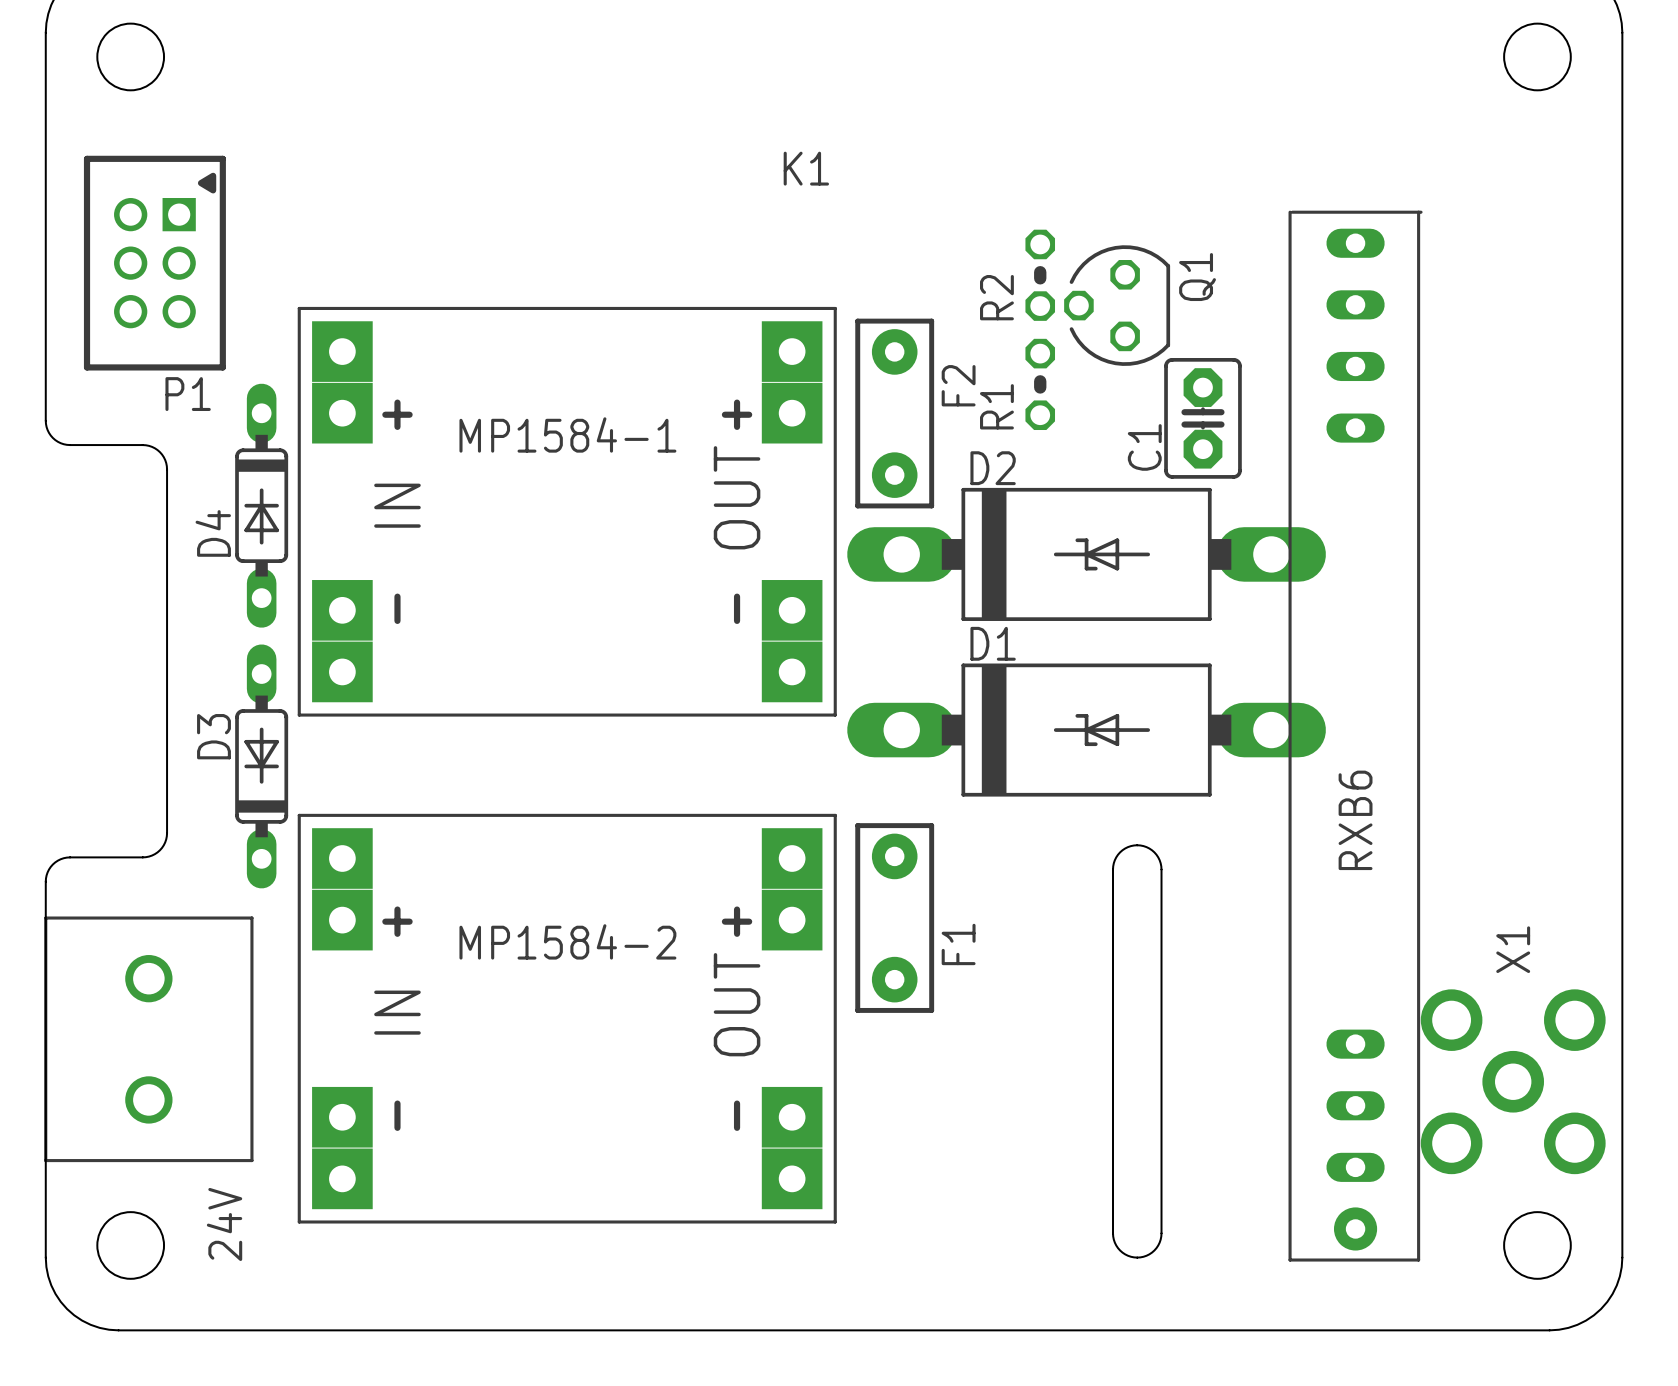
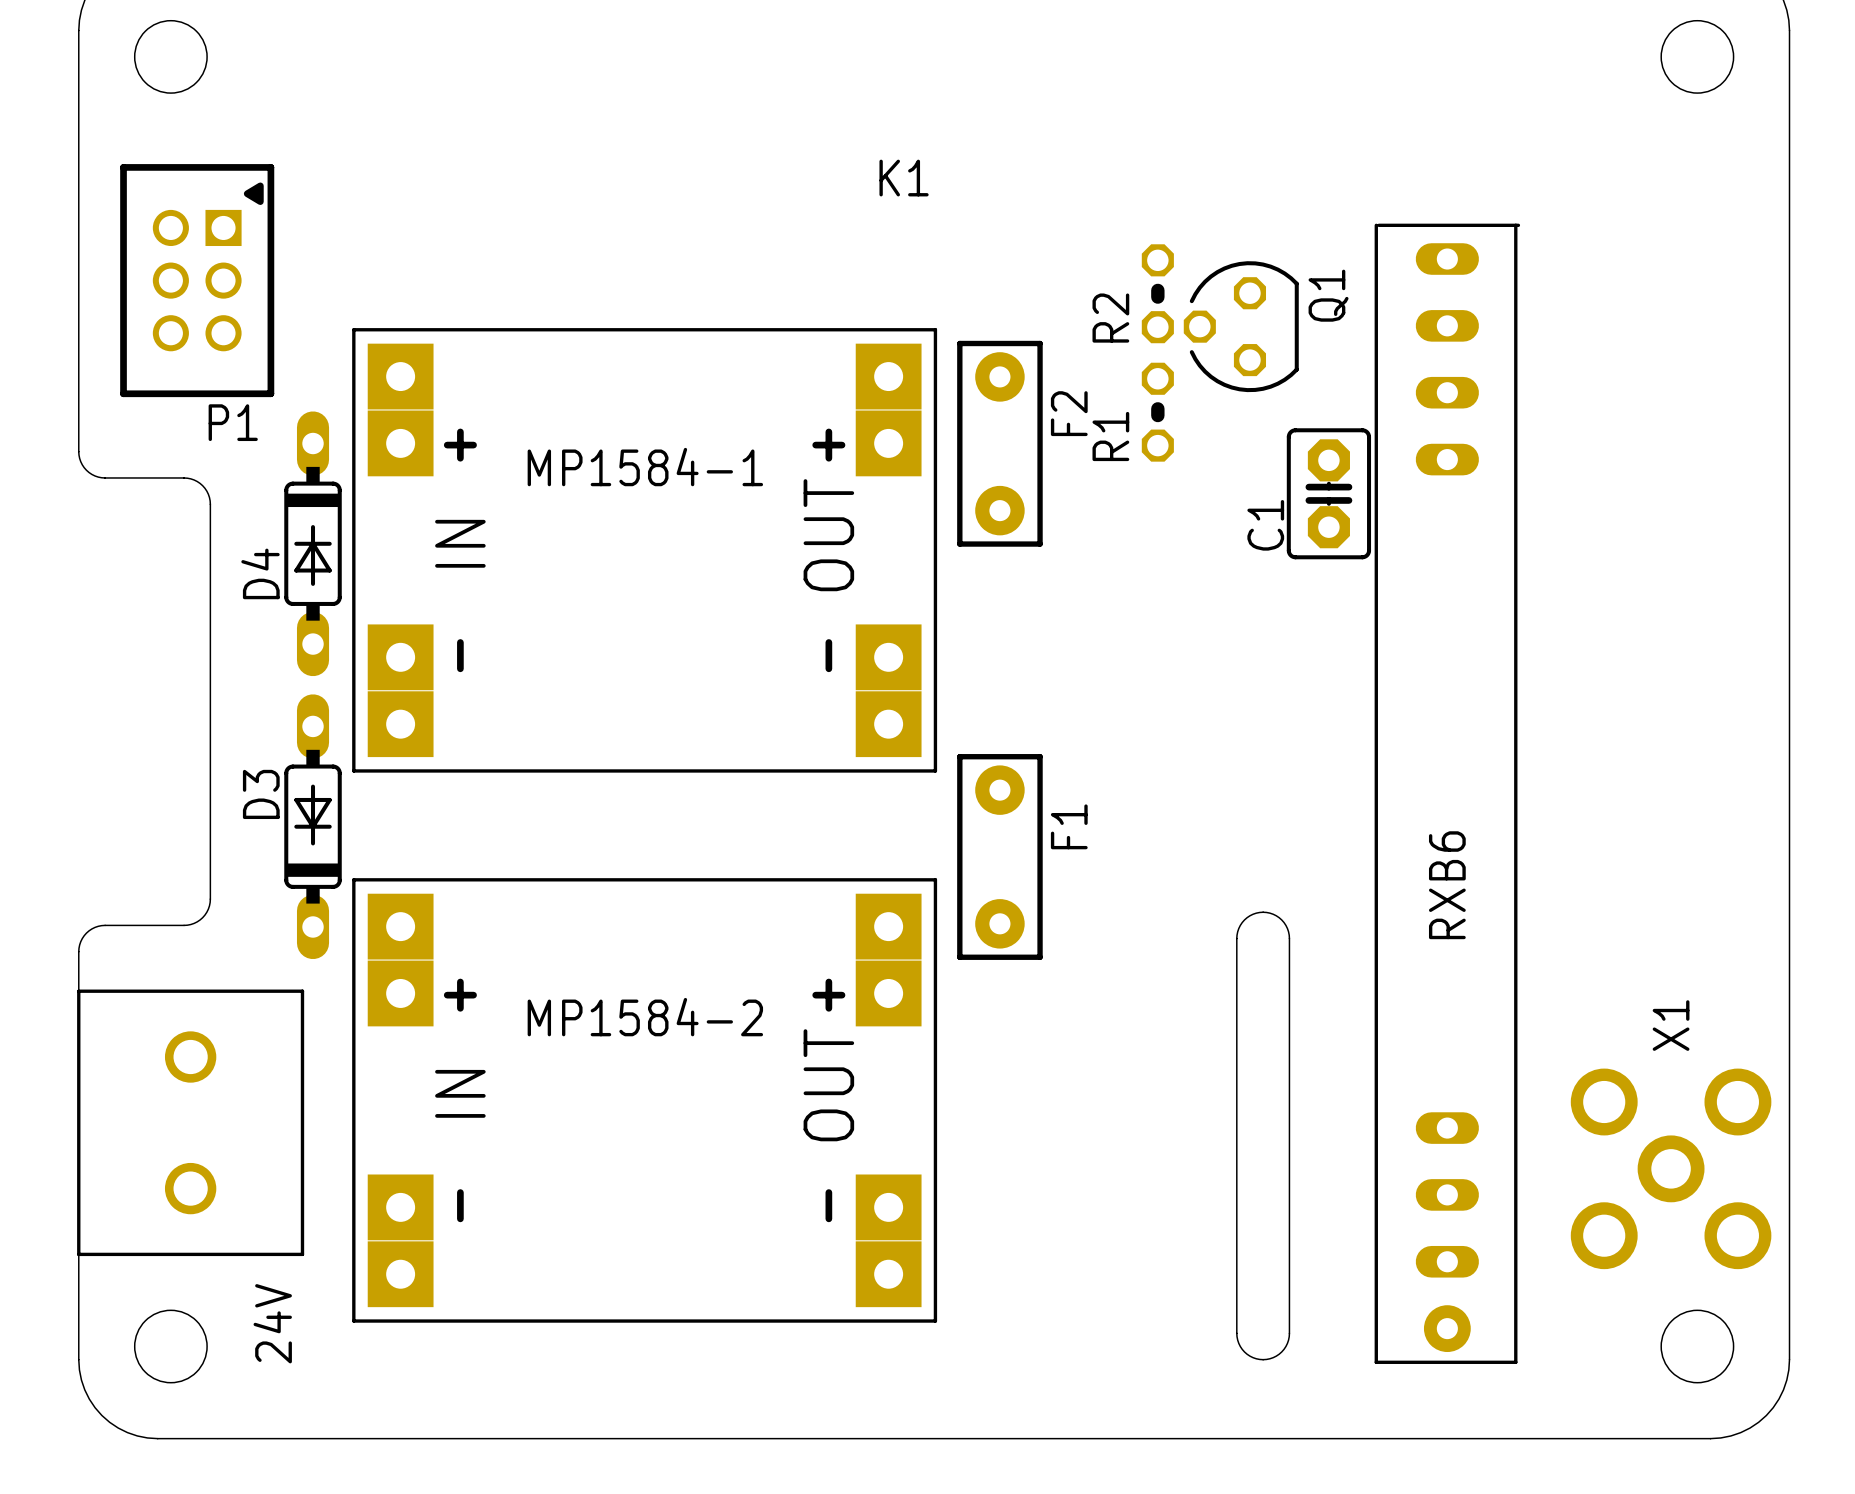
C1 position: (1202, 418) -> (1328, 493)
D2: (1086, 554) -> none
D1: (1086, 730) -> none
RXB6 position: (1355, 736) -> (1447, 793)
F1 position: (894, 918) -> (999, 856)
F1 name position: F1 (958, 944) -> F1 (1069, 826)

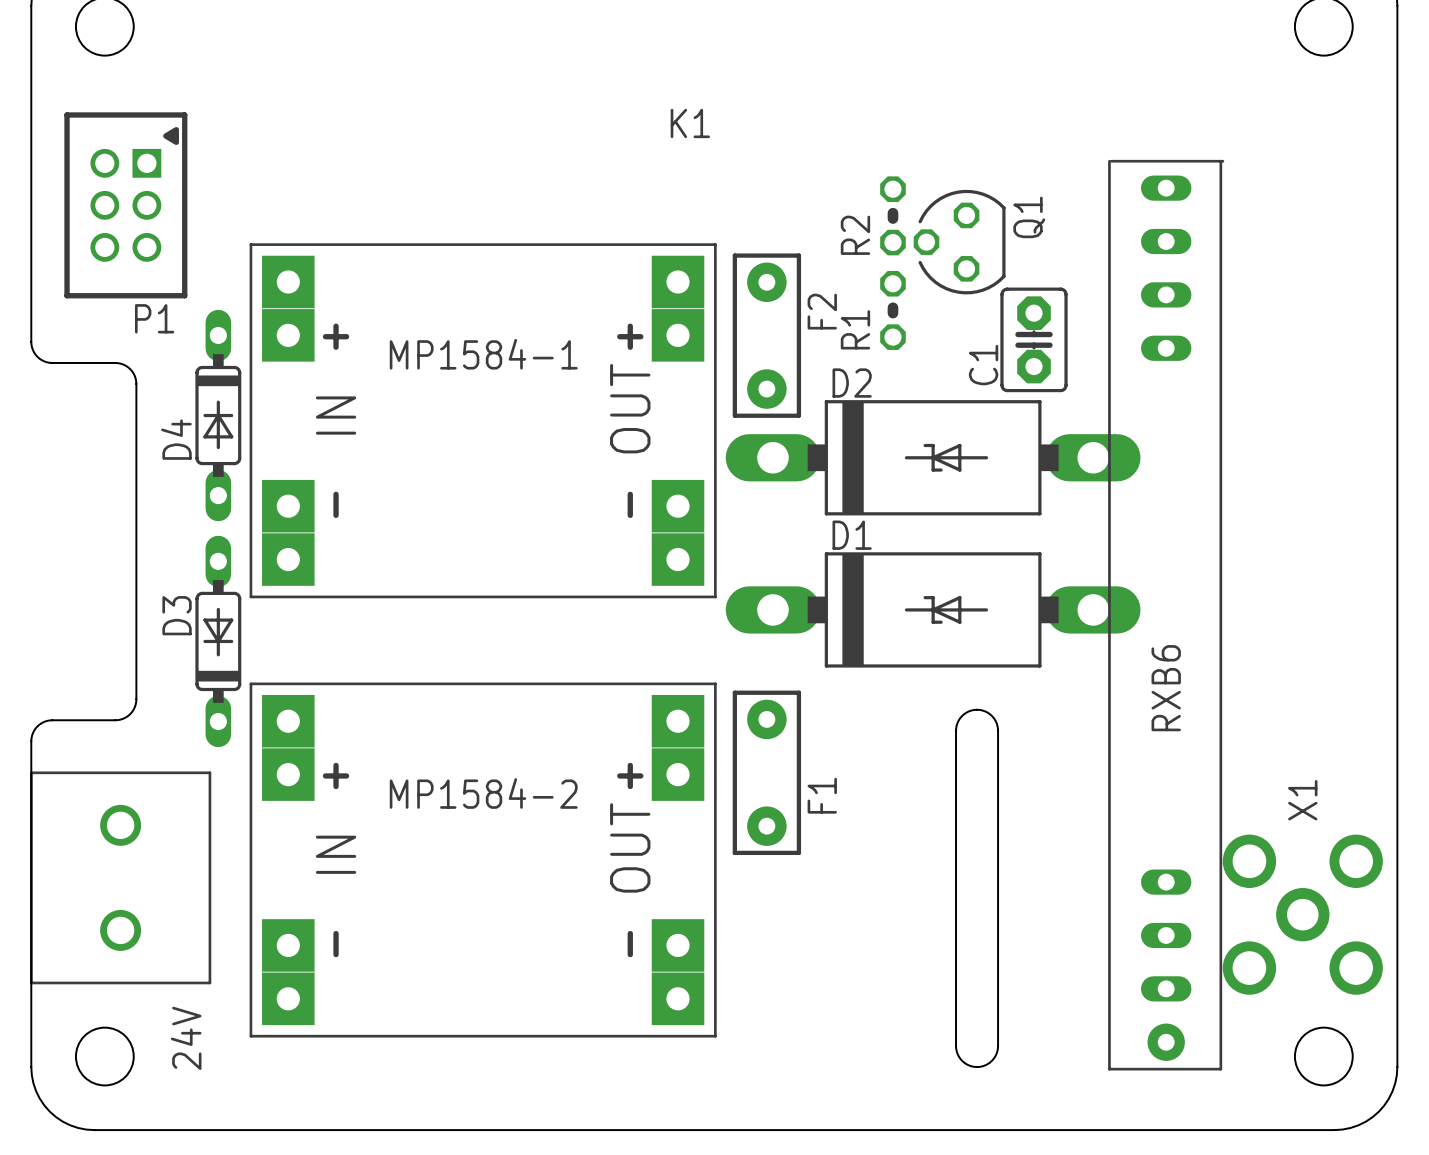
C1 position: (1328, 493) -> (1034, 339)
D2: none -> (933, 457)
D1: none -> (933, 609)
RXB6 position: (1447, 793) -> (1166, 615)
F1 name position: F1 (1069, 826) -> F1 (822, 795)
F1 position: (999, 856) -> (766, 772)

